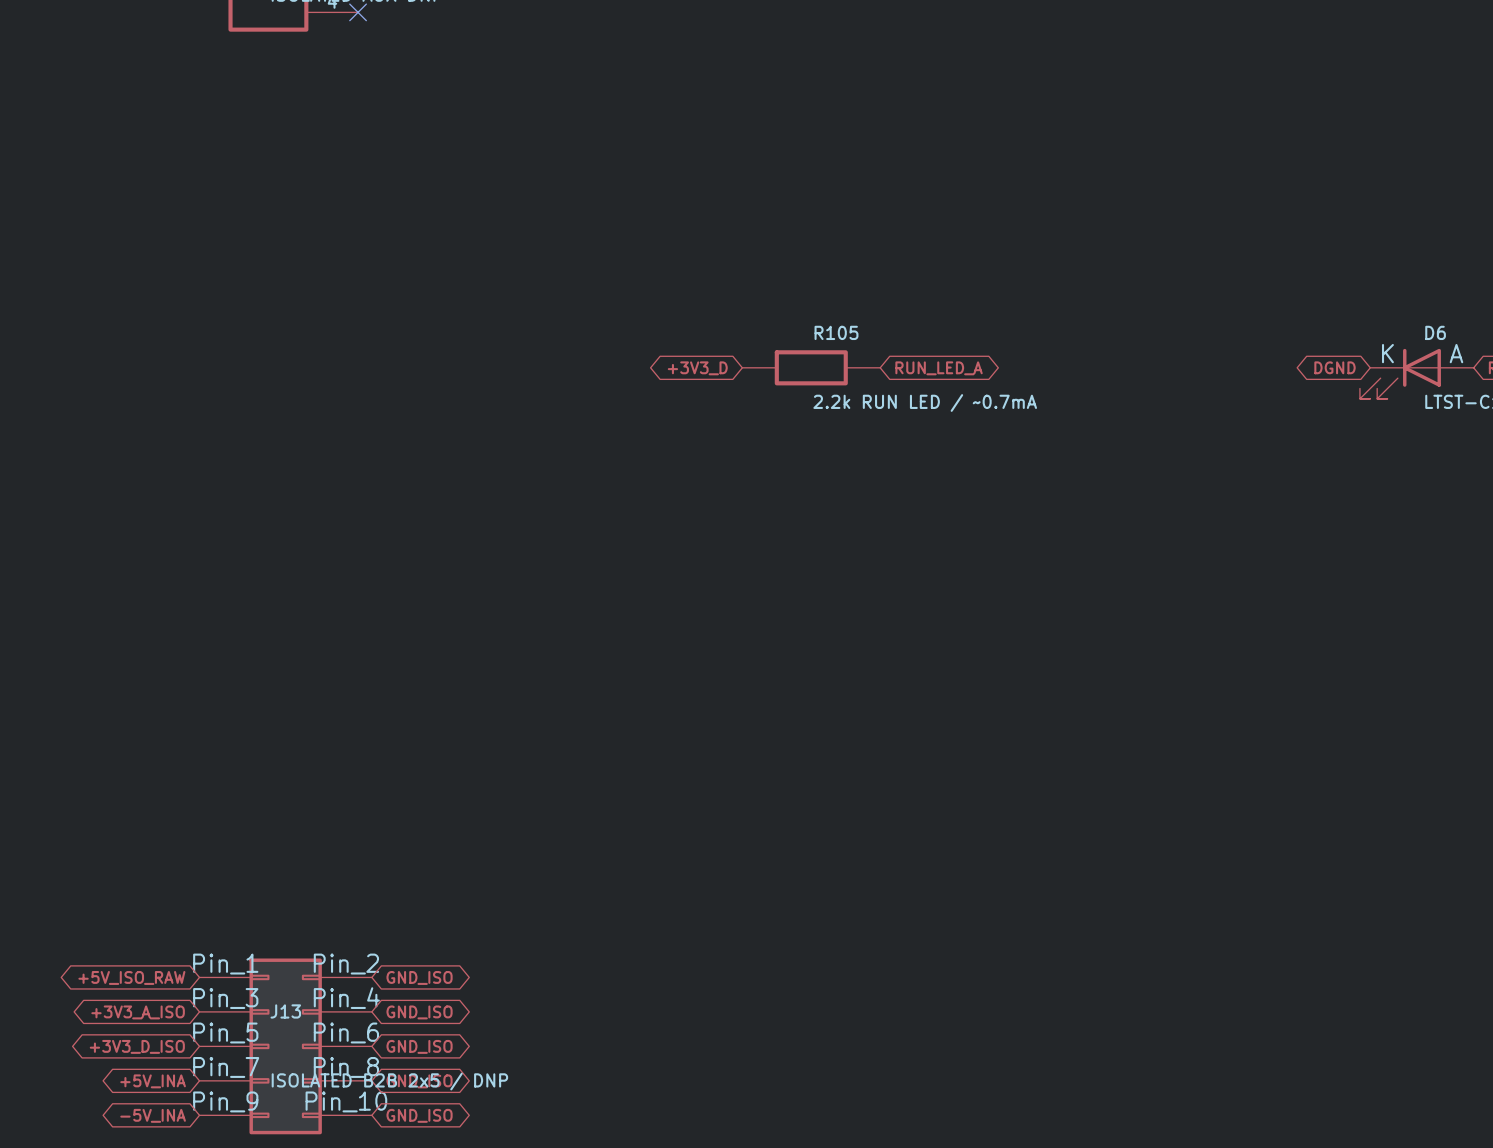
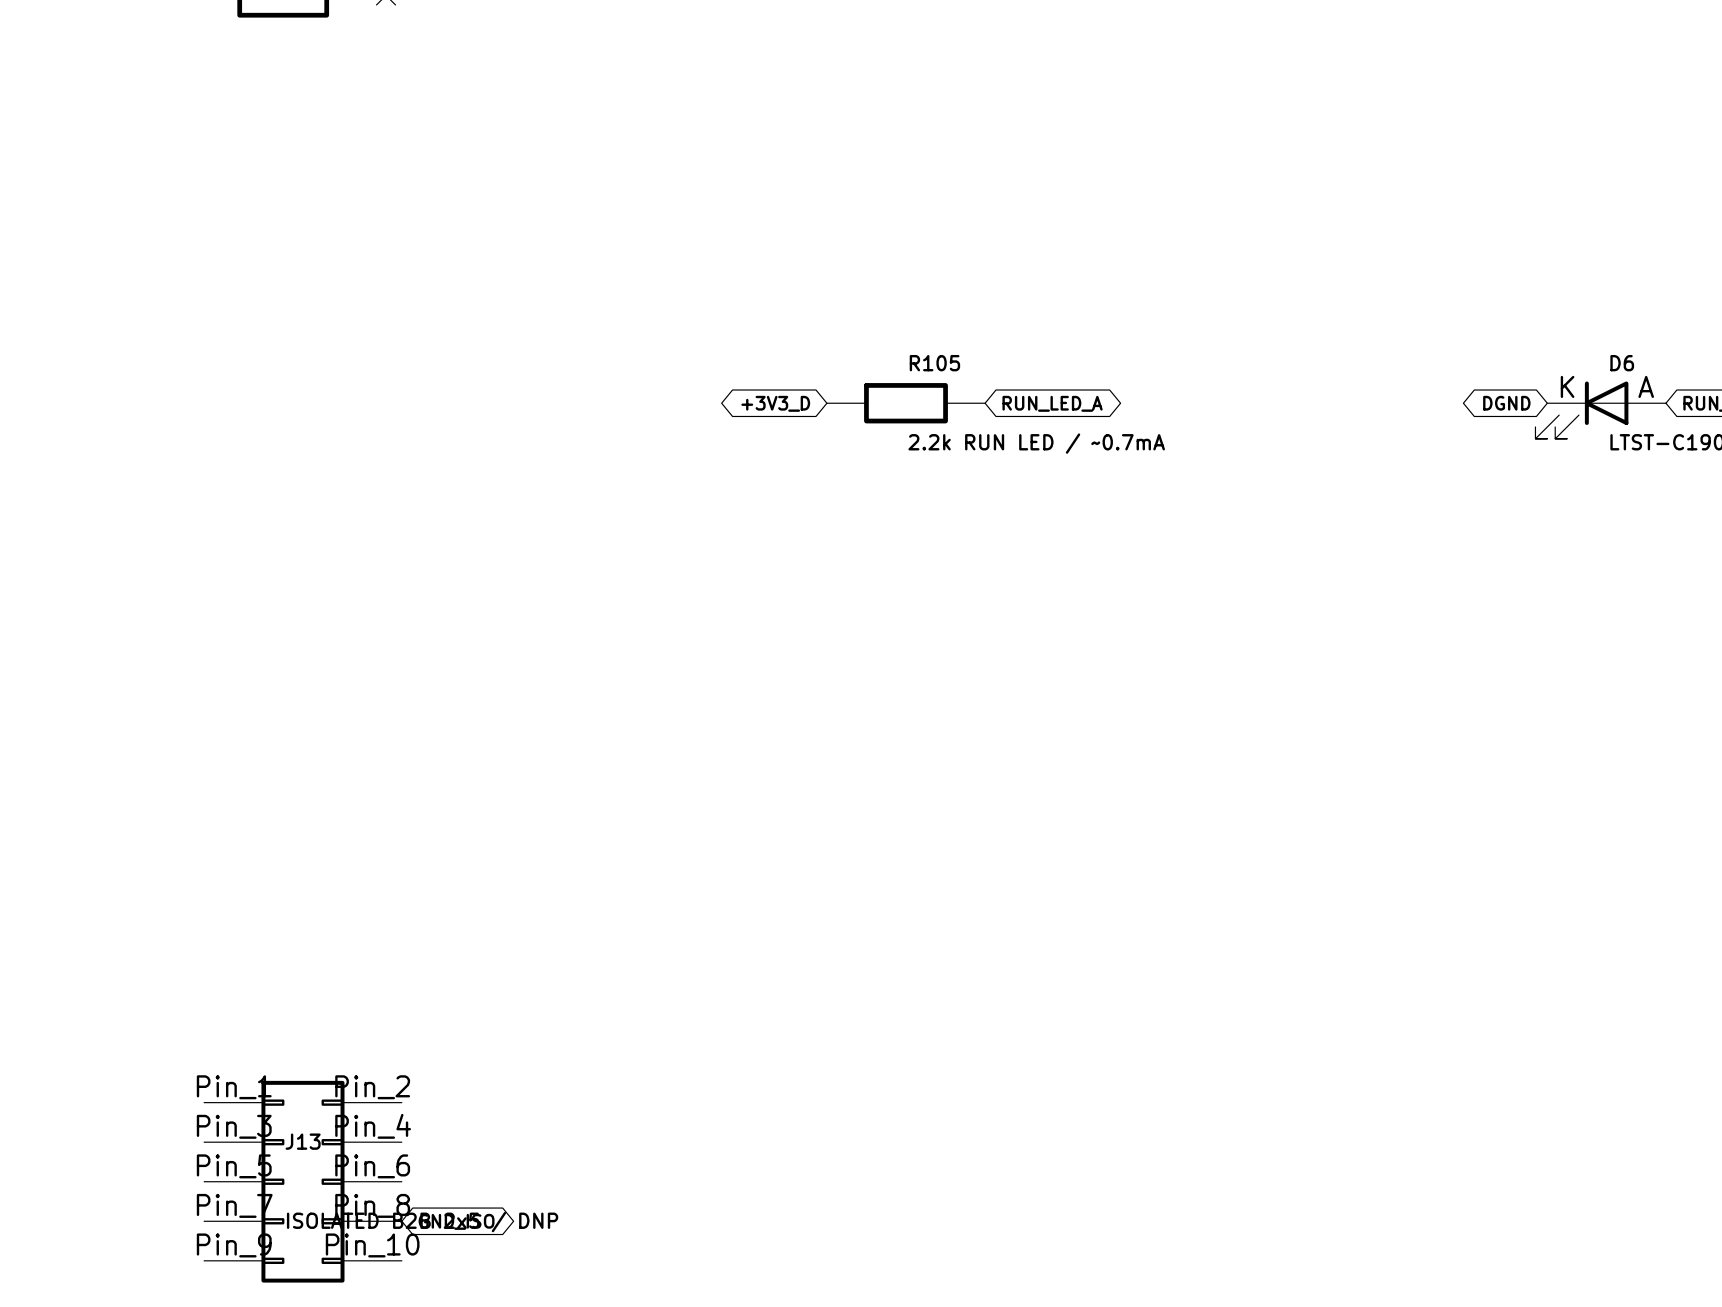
global label: +5V_ISO_RAW (131, 977) -> none
global label: GND_ISO (419, 977) -> none
global label: +3V3_A_ISO (138, 1012) -> none
global label: GND_ISO (419, 1012) -> none
global label: +3V3_D_ISO (137, 1046) -> none
global label: GND_ISO (419, 1046) -> none
global label: +5V_INA (153, 1081) -> none
global label: -5V_INA (153, 1115) -> none
global label: GND_ISO (419, 1115) -> none

